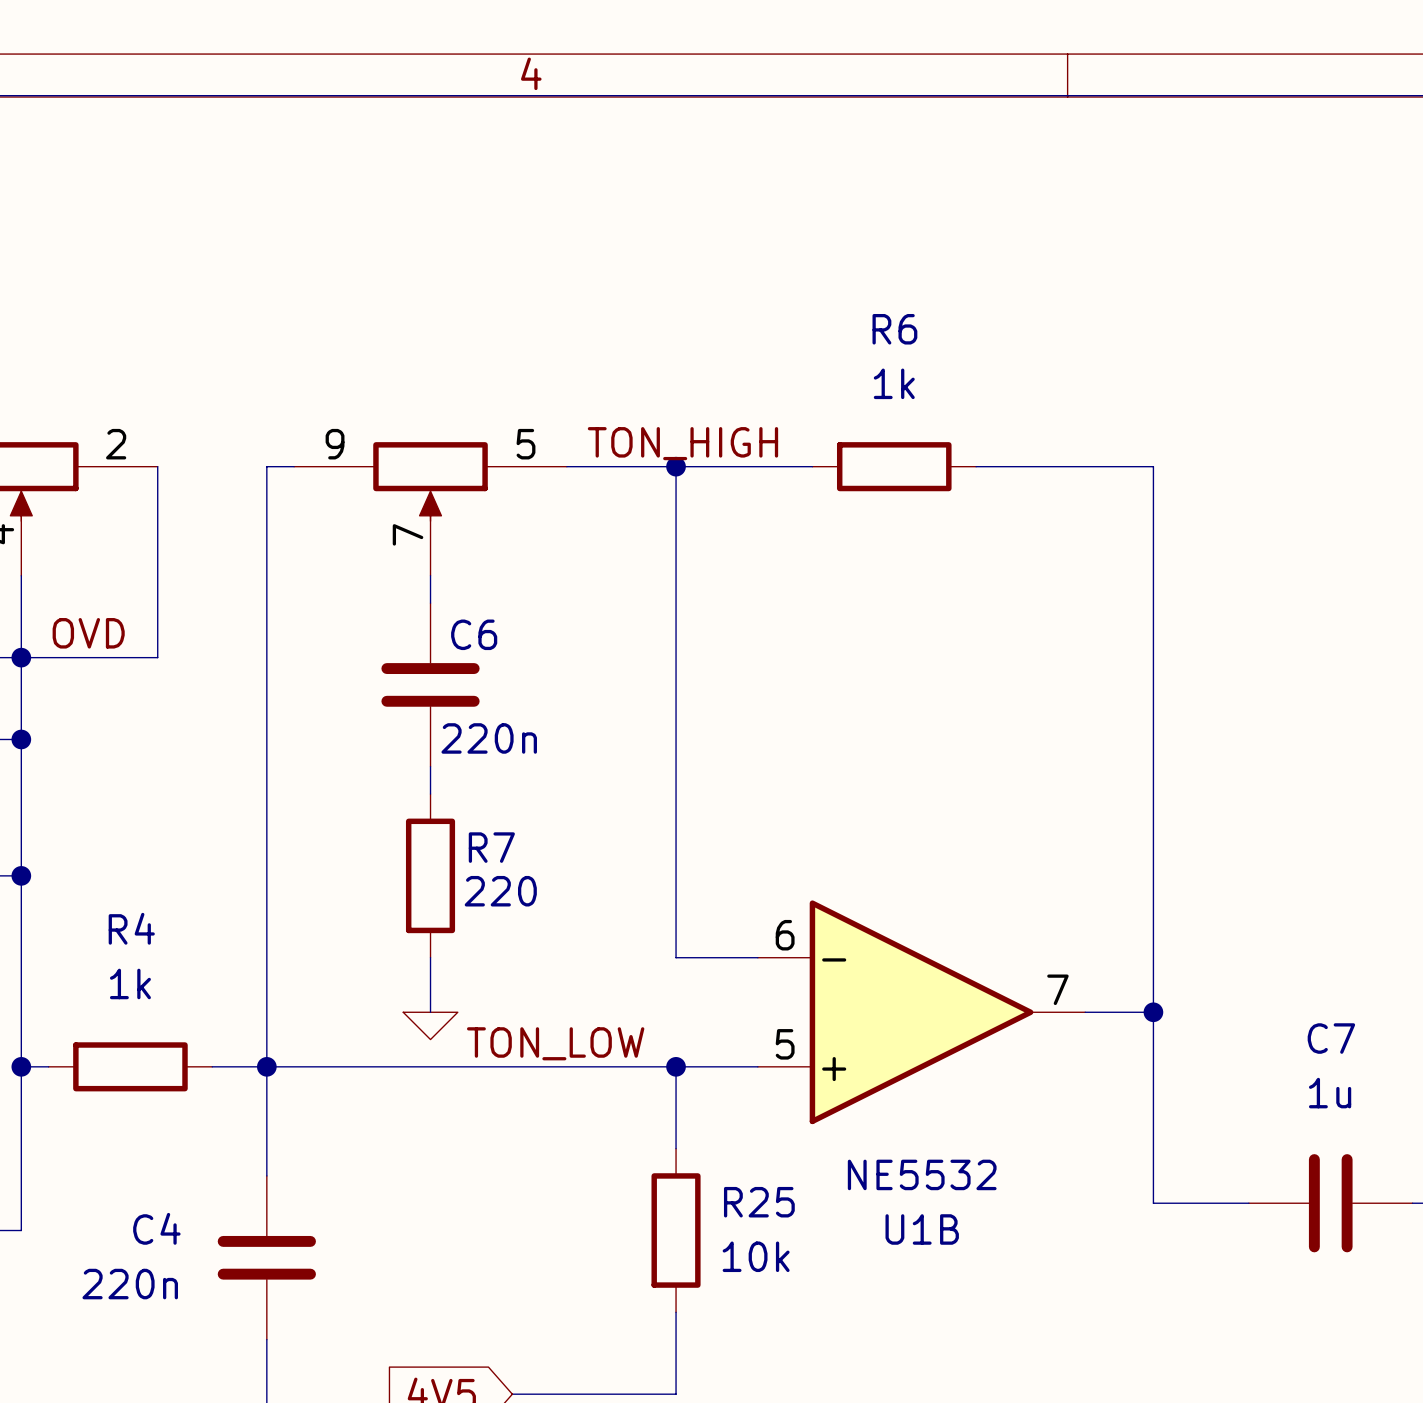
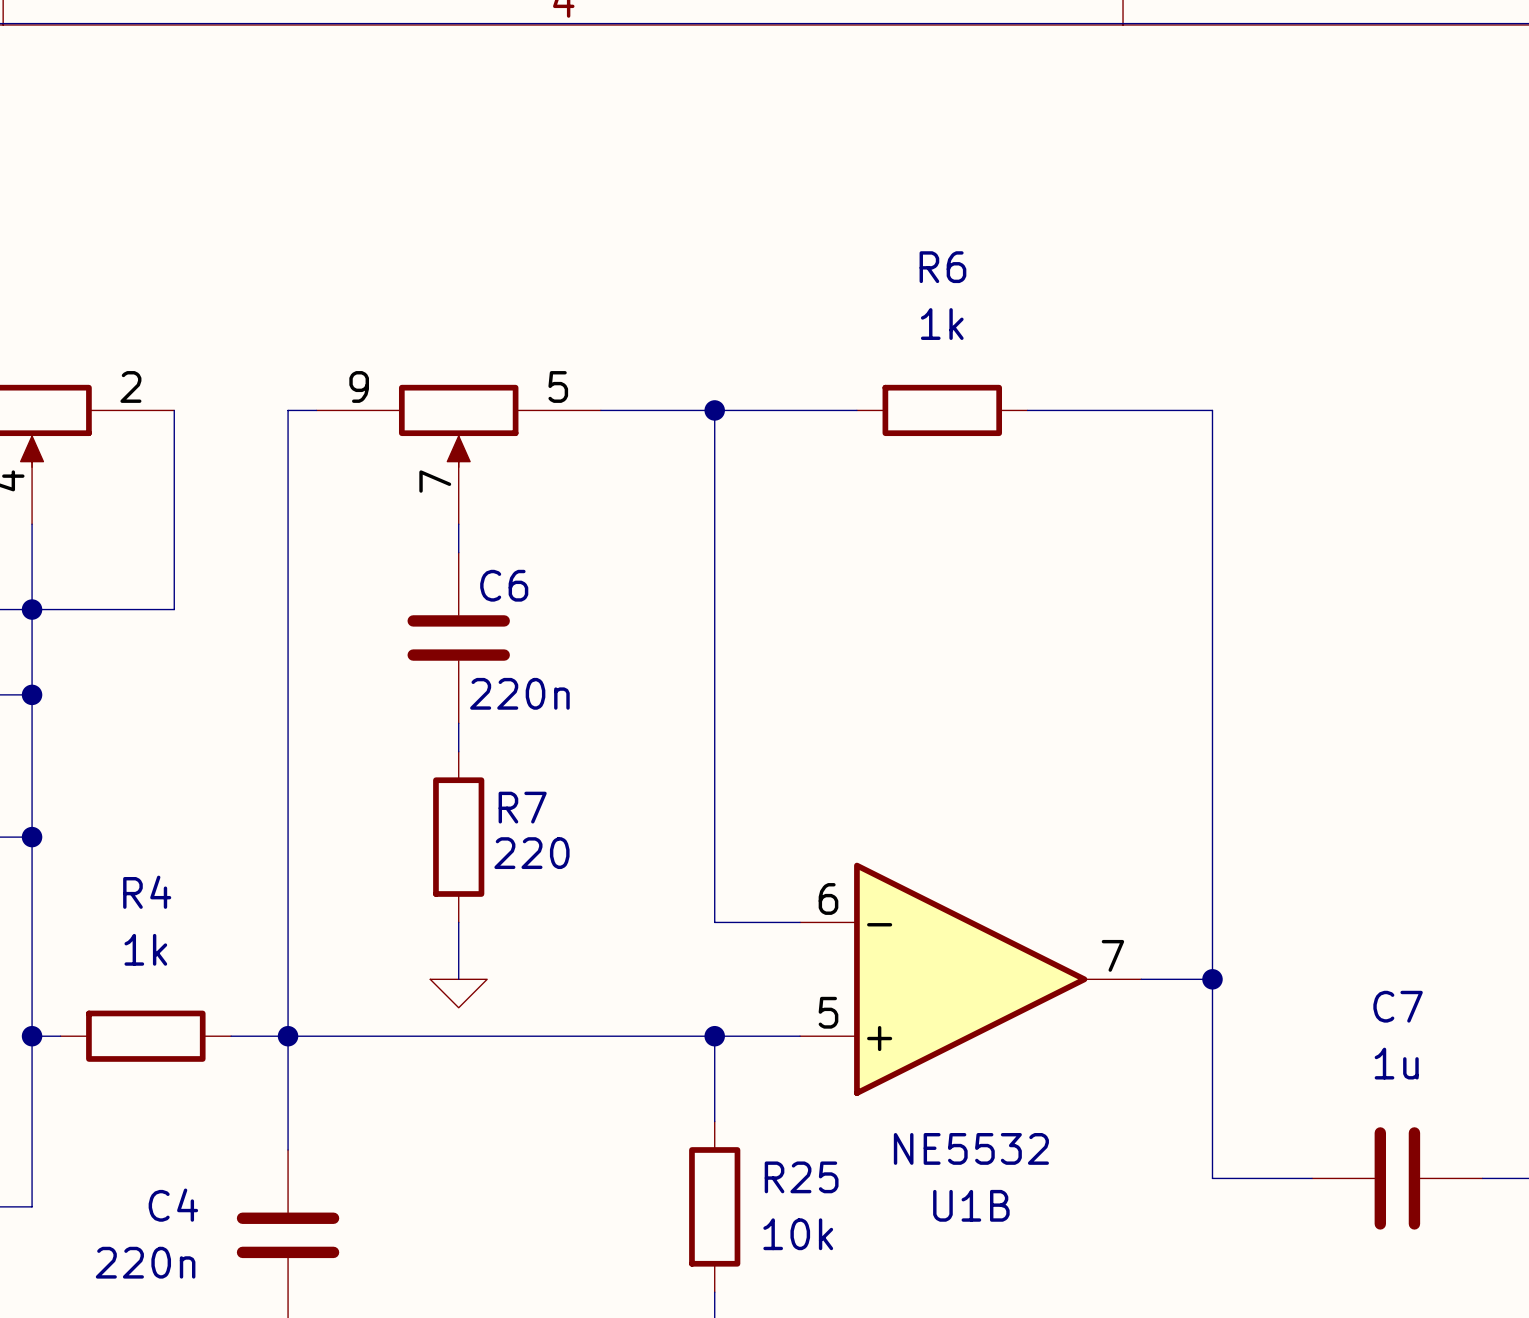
label: TON_HIGH (682, 443) -> none
label: OVD (88, 633) -> none
label: TON_LOW (555, 1043) -> none

